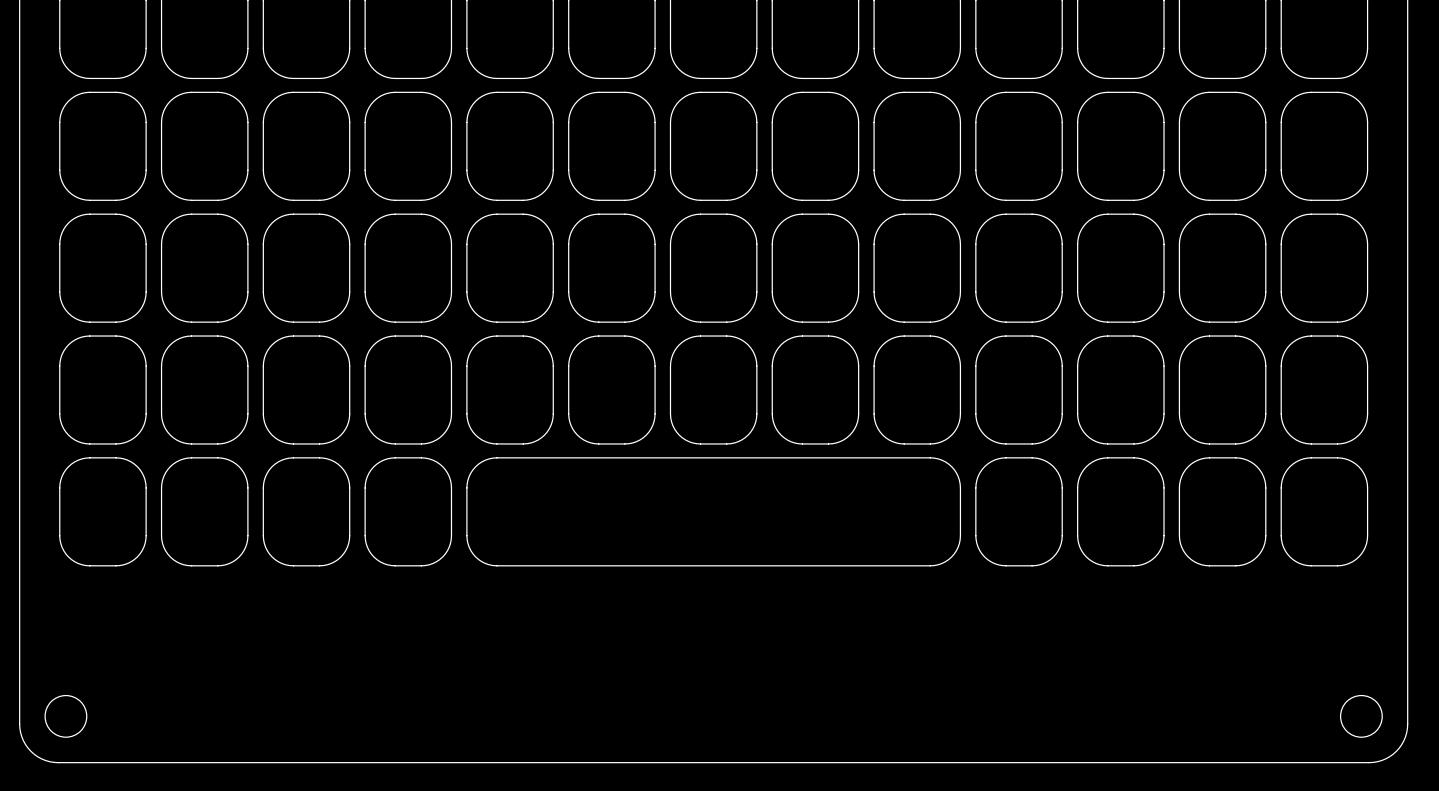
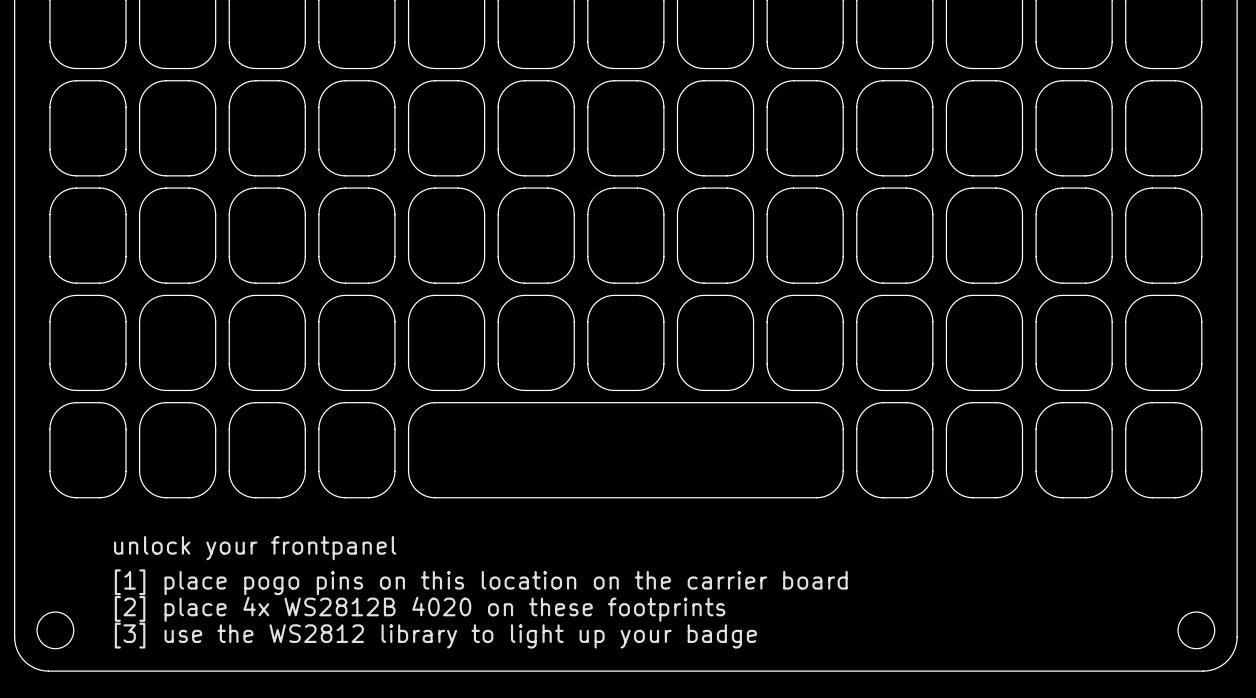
text: none -> unlock your frontpanel (255, 548)
text: none -> [1] place pogo pins on this location on the carrier board (481, 582)
text: none -> [2] place 4x WS2812B 4020 on these footprints (420, 608)
text: none -> [3] use the WS2812 library to light up your badge (435, 635)

